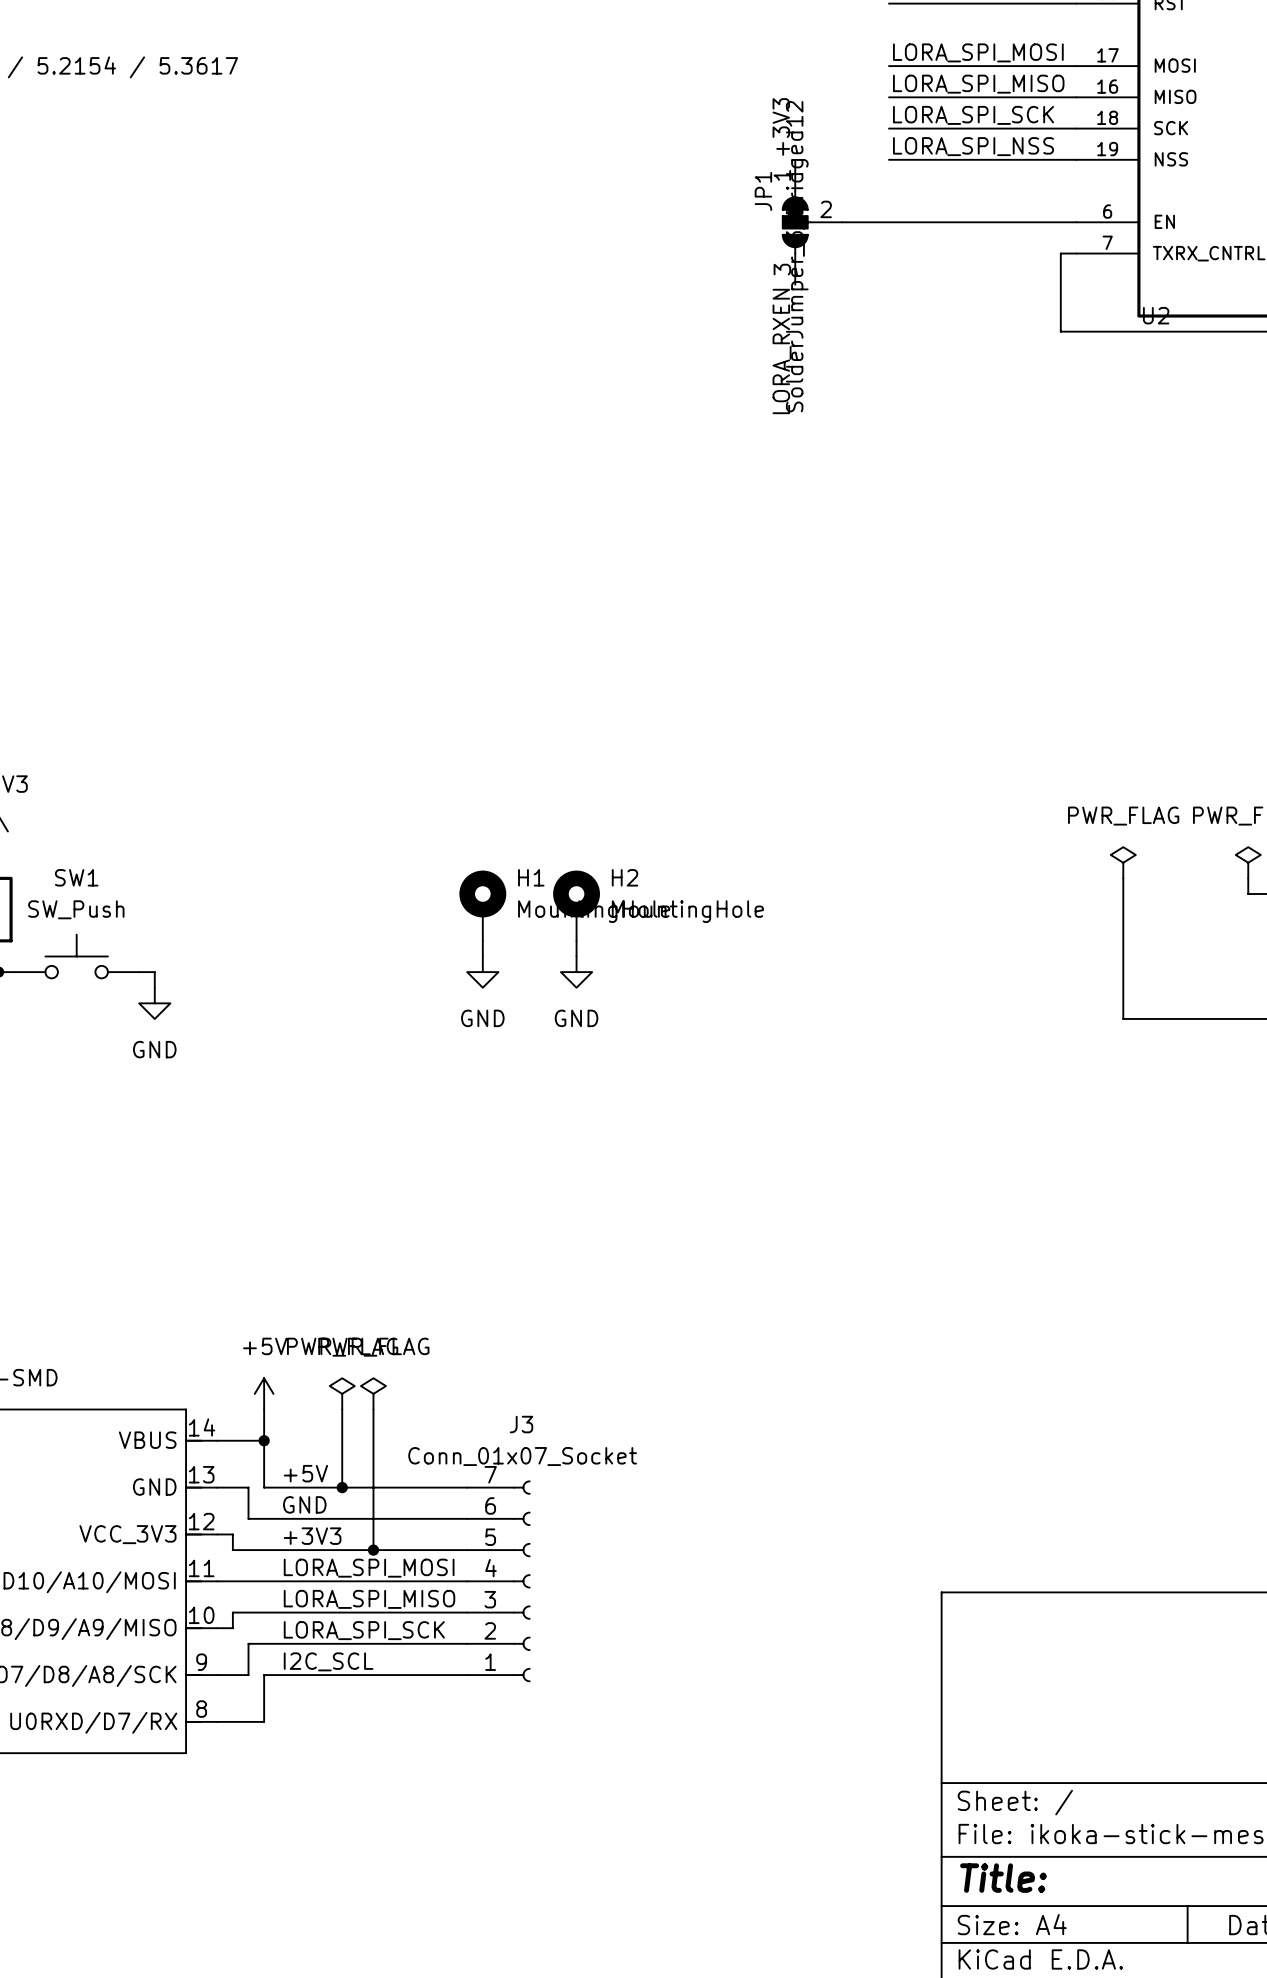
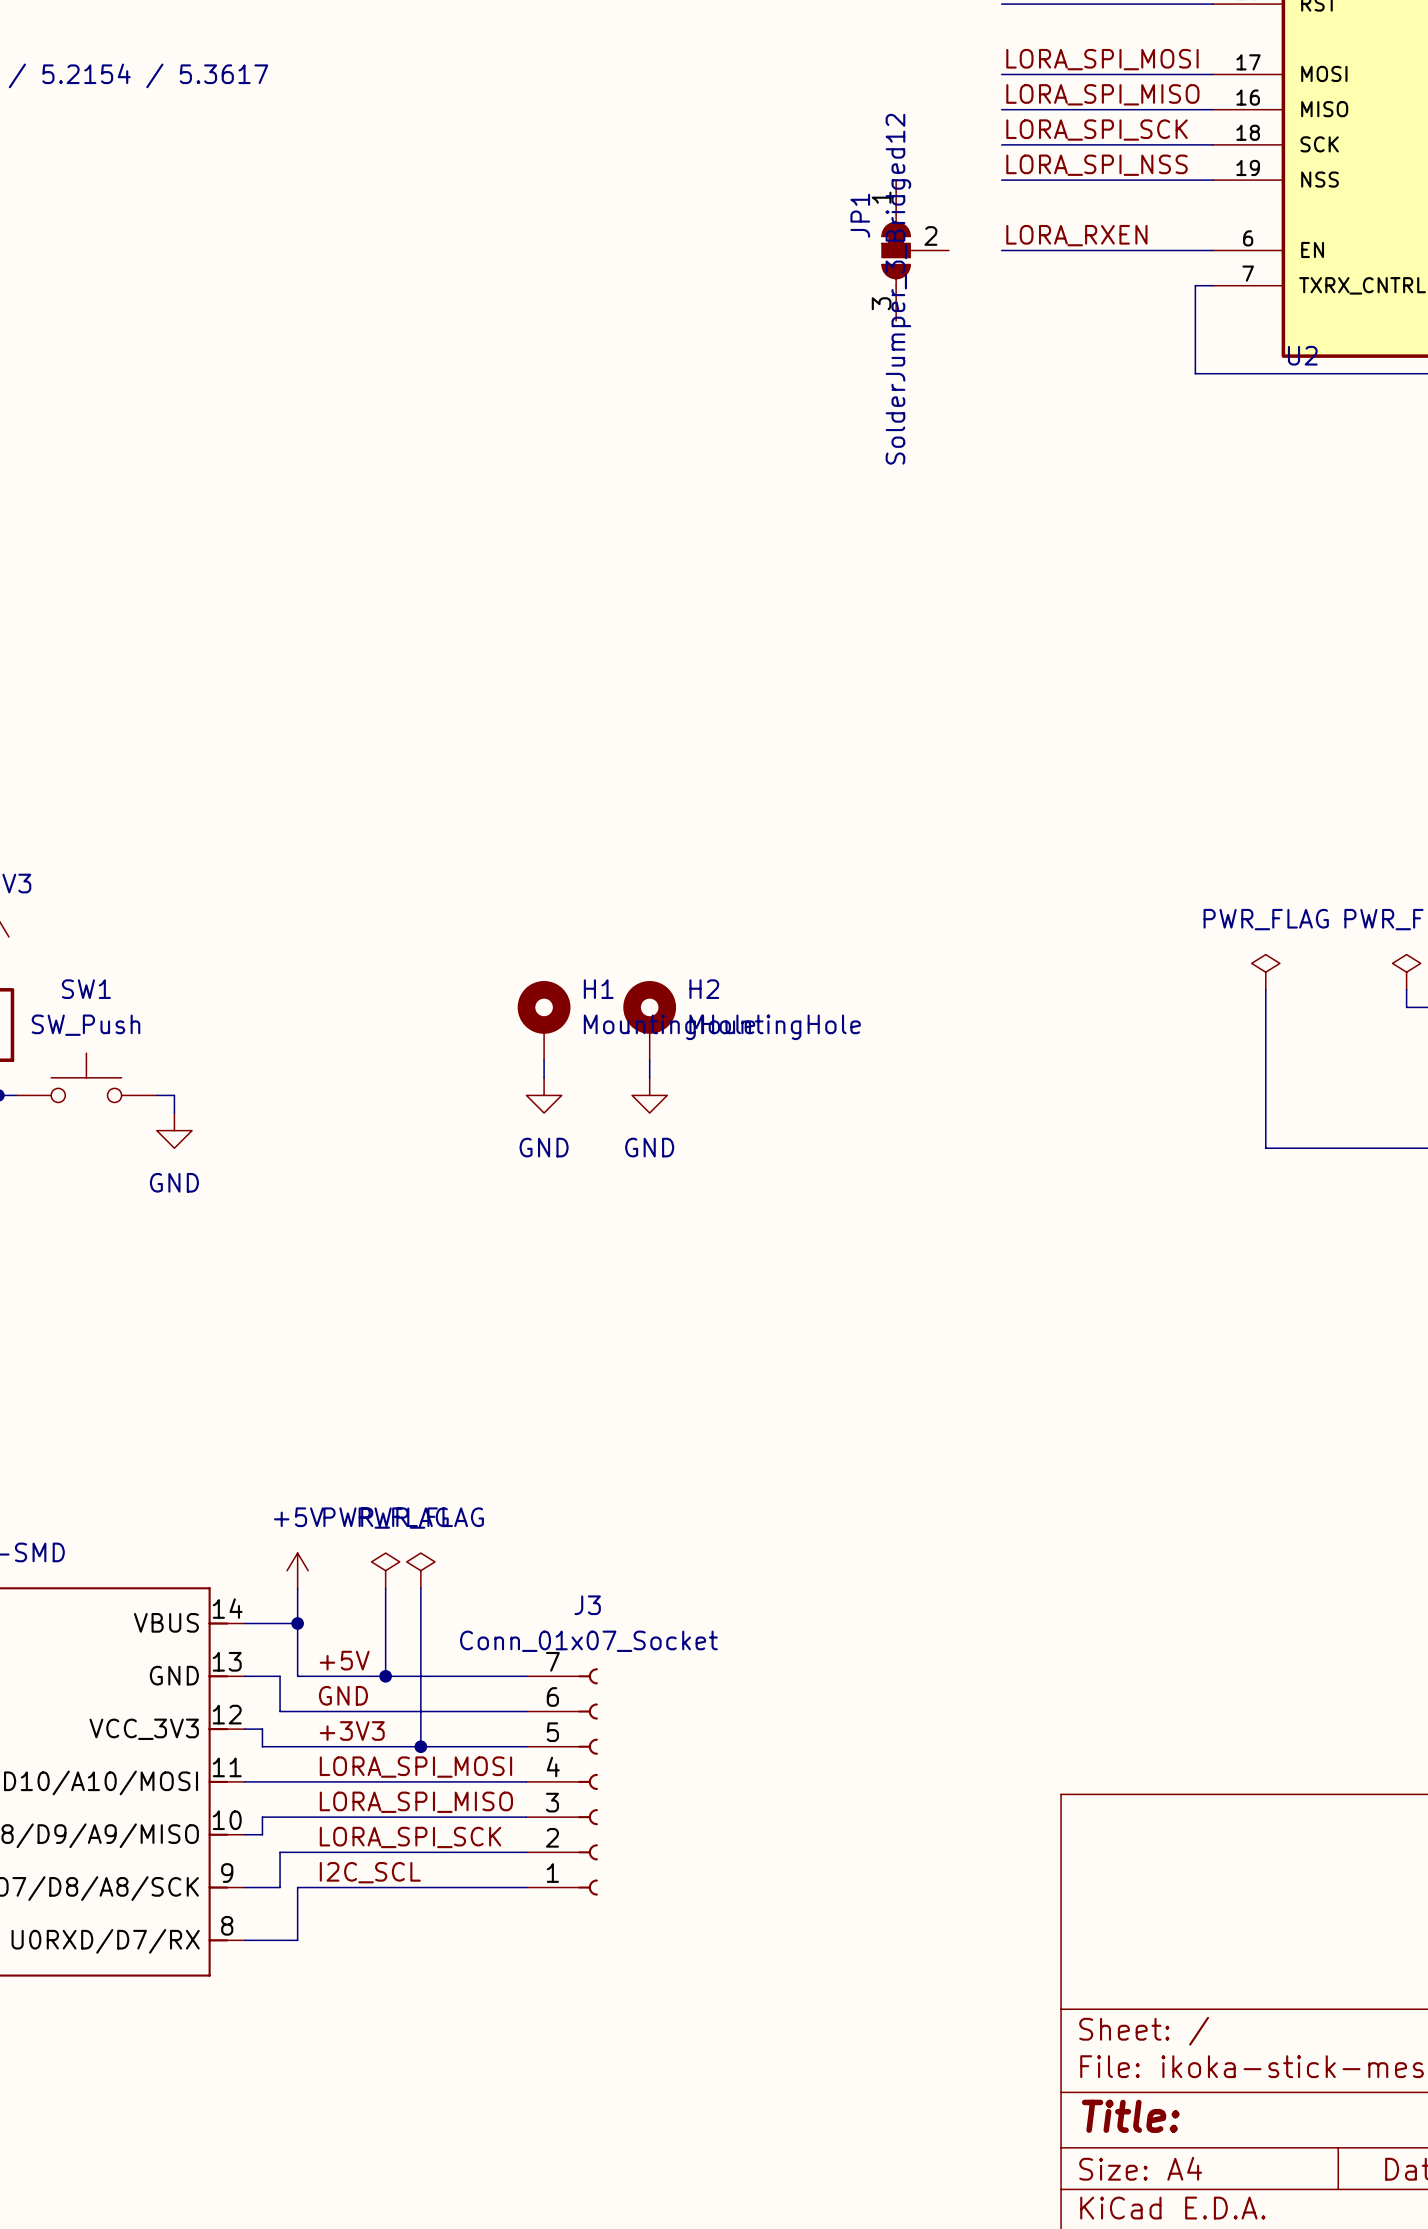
label: +3V3 (781, 126) -> none
wire: (842, 222) (888, 222) -> none
label rotation: 0° (782, 351) -> 90° clockwise (1076, 235)
label position: LORA_RXEN (782, 351) -> LORA_RXEN (1076, 235)

